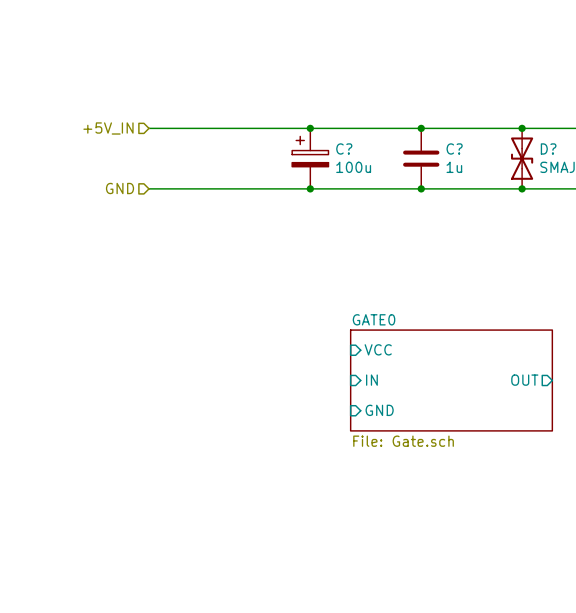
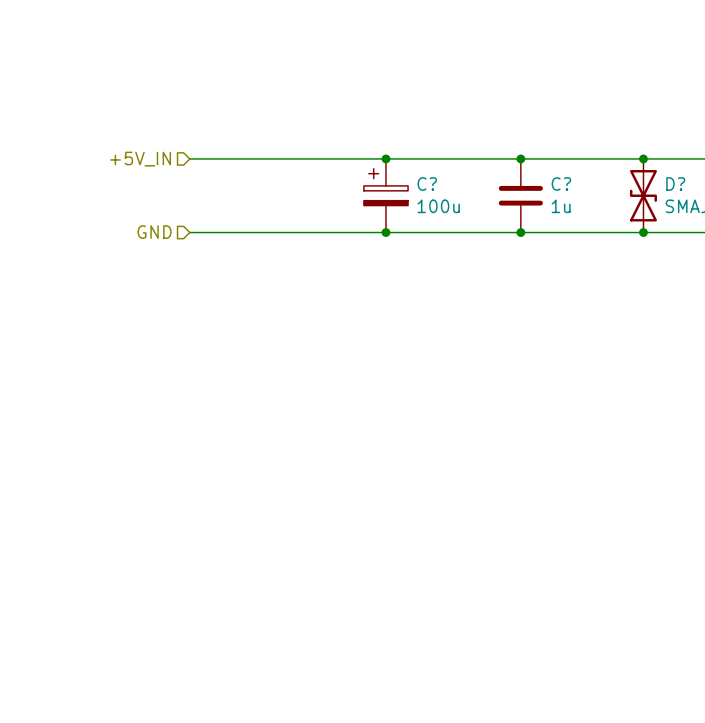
sheet pin: VCC (378, 349) -> none
sheet pin: IN (371, 380) -> none
sheet GATE0: File: Gate.sch (451, 380) -> none
sheet pin: OUT (524, 380) -> none
sheet pin: GND (379, 410) -> none

